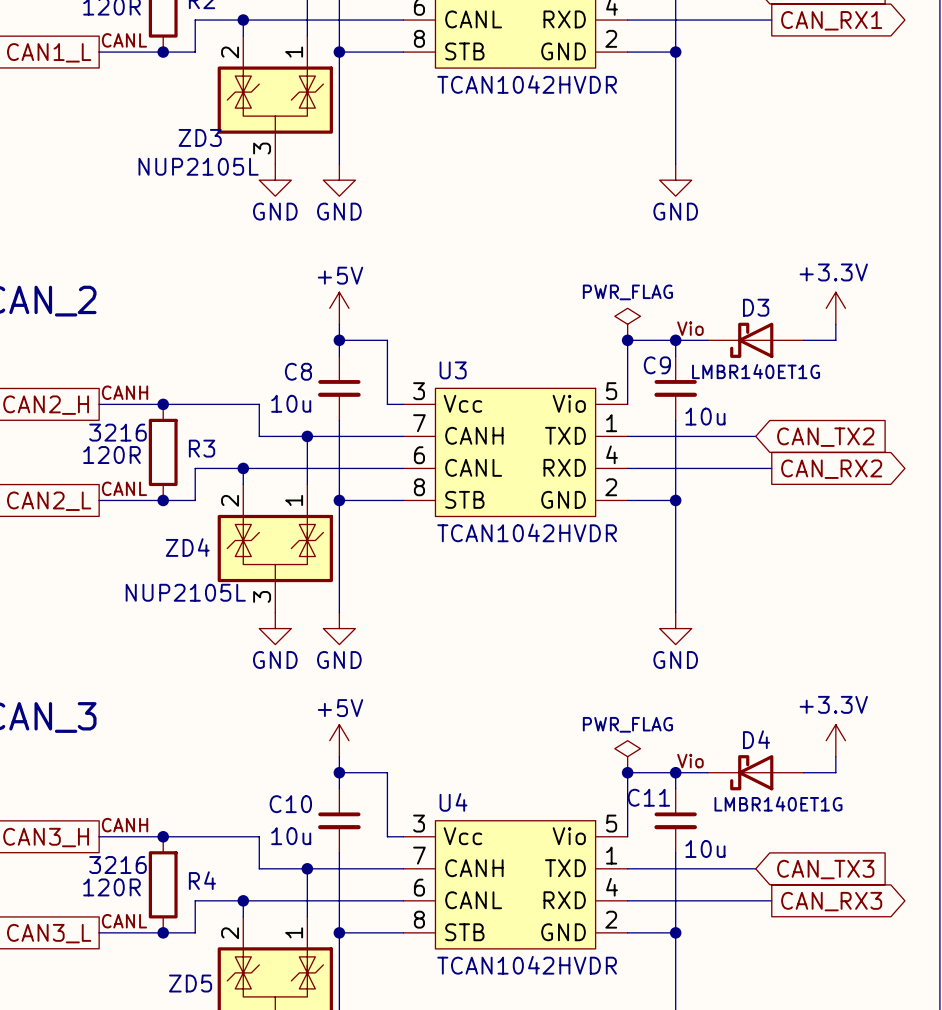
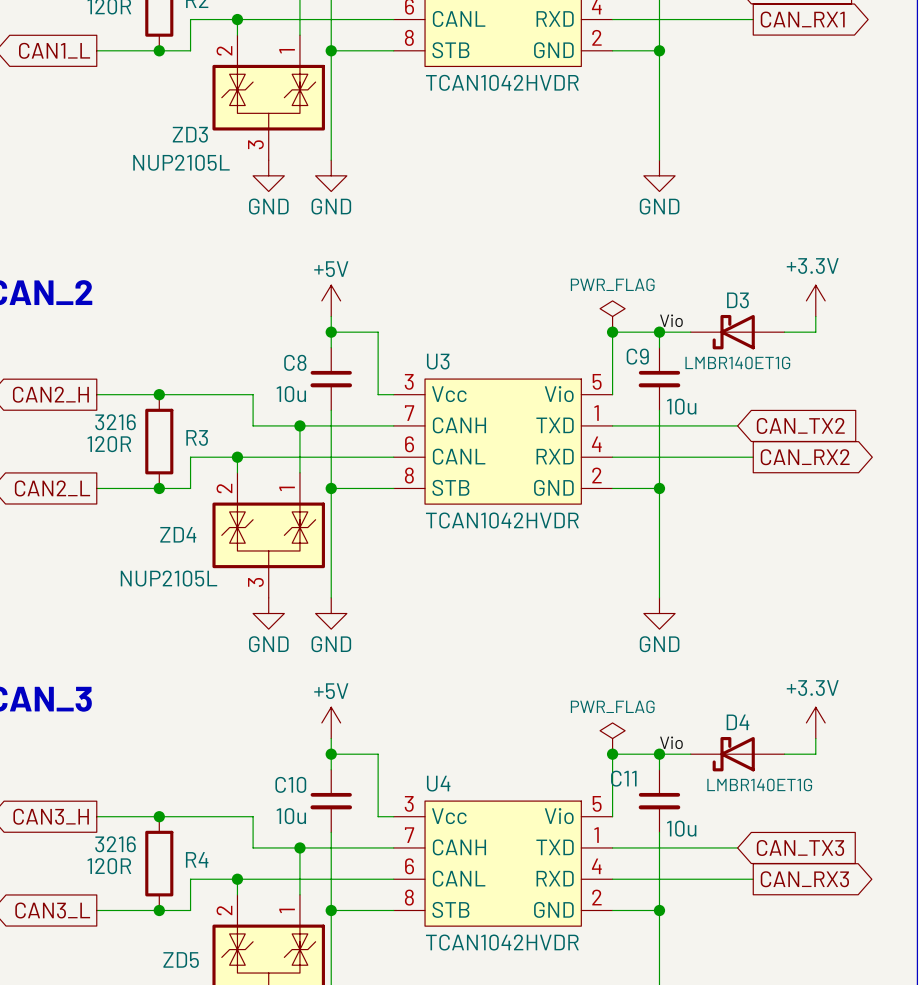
label: CANL (124, 40) -> none
label: CANH (125, 392) -> none
label: CANL (124, 488) -> none
label: CANH (125, 825) -> none
label: CANL (124, 921) -> none

